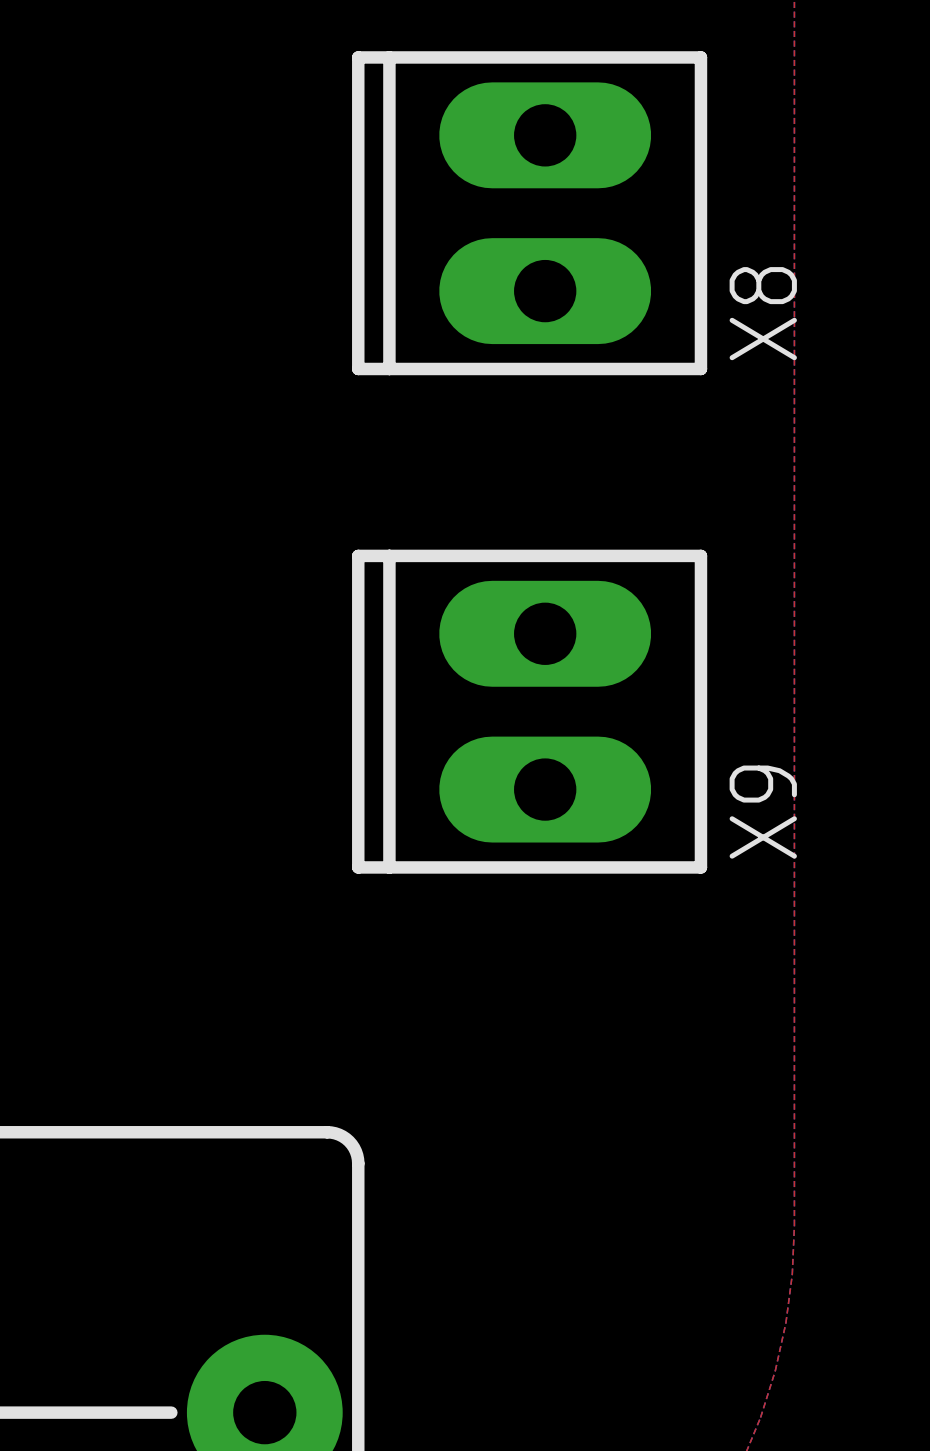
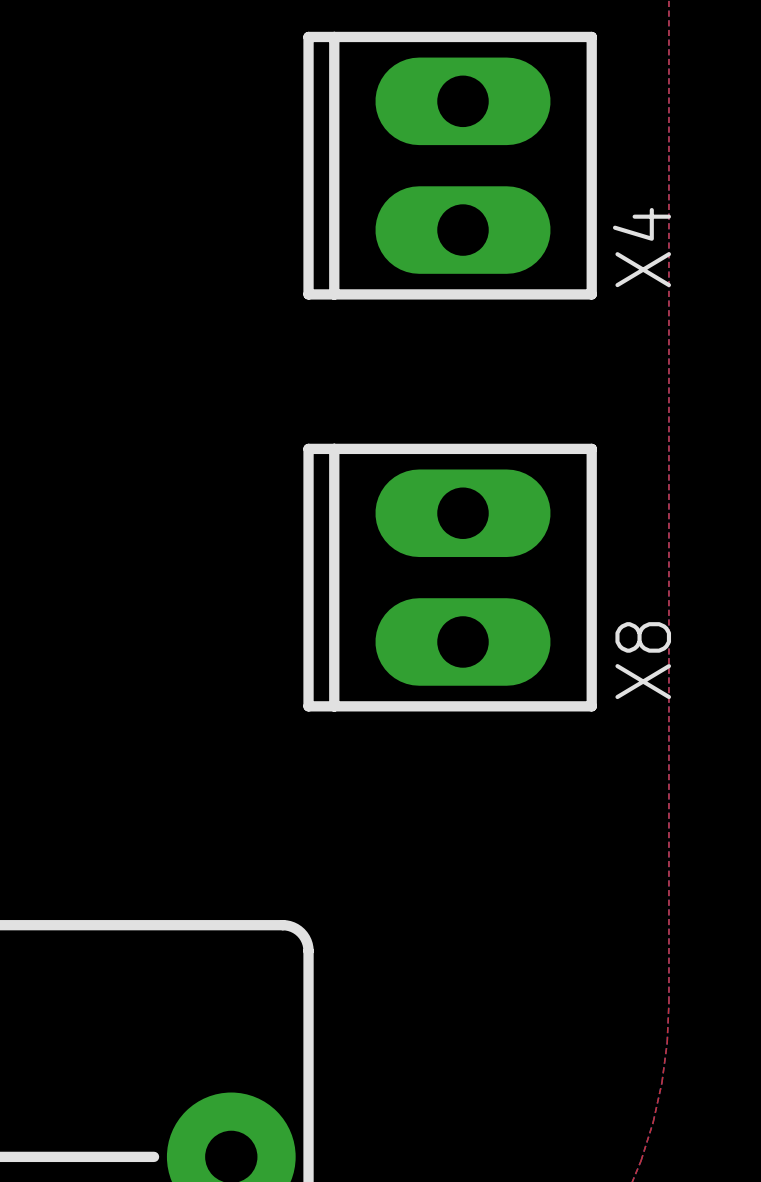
X8 name: X8 (763, 313) -> X4 (641, 247)
X9 name: X9 (763, 812) -> X8 (643, 660)

